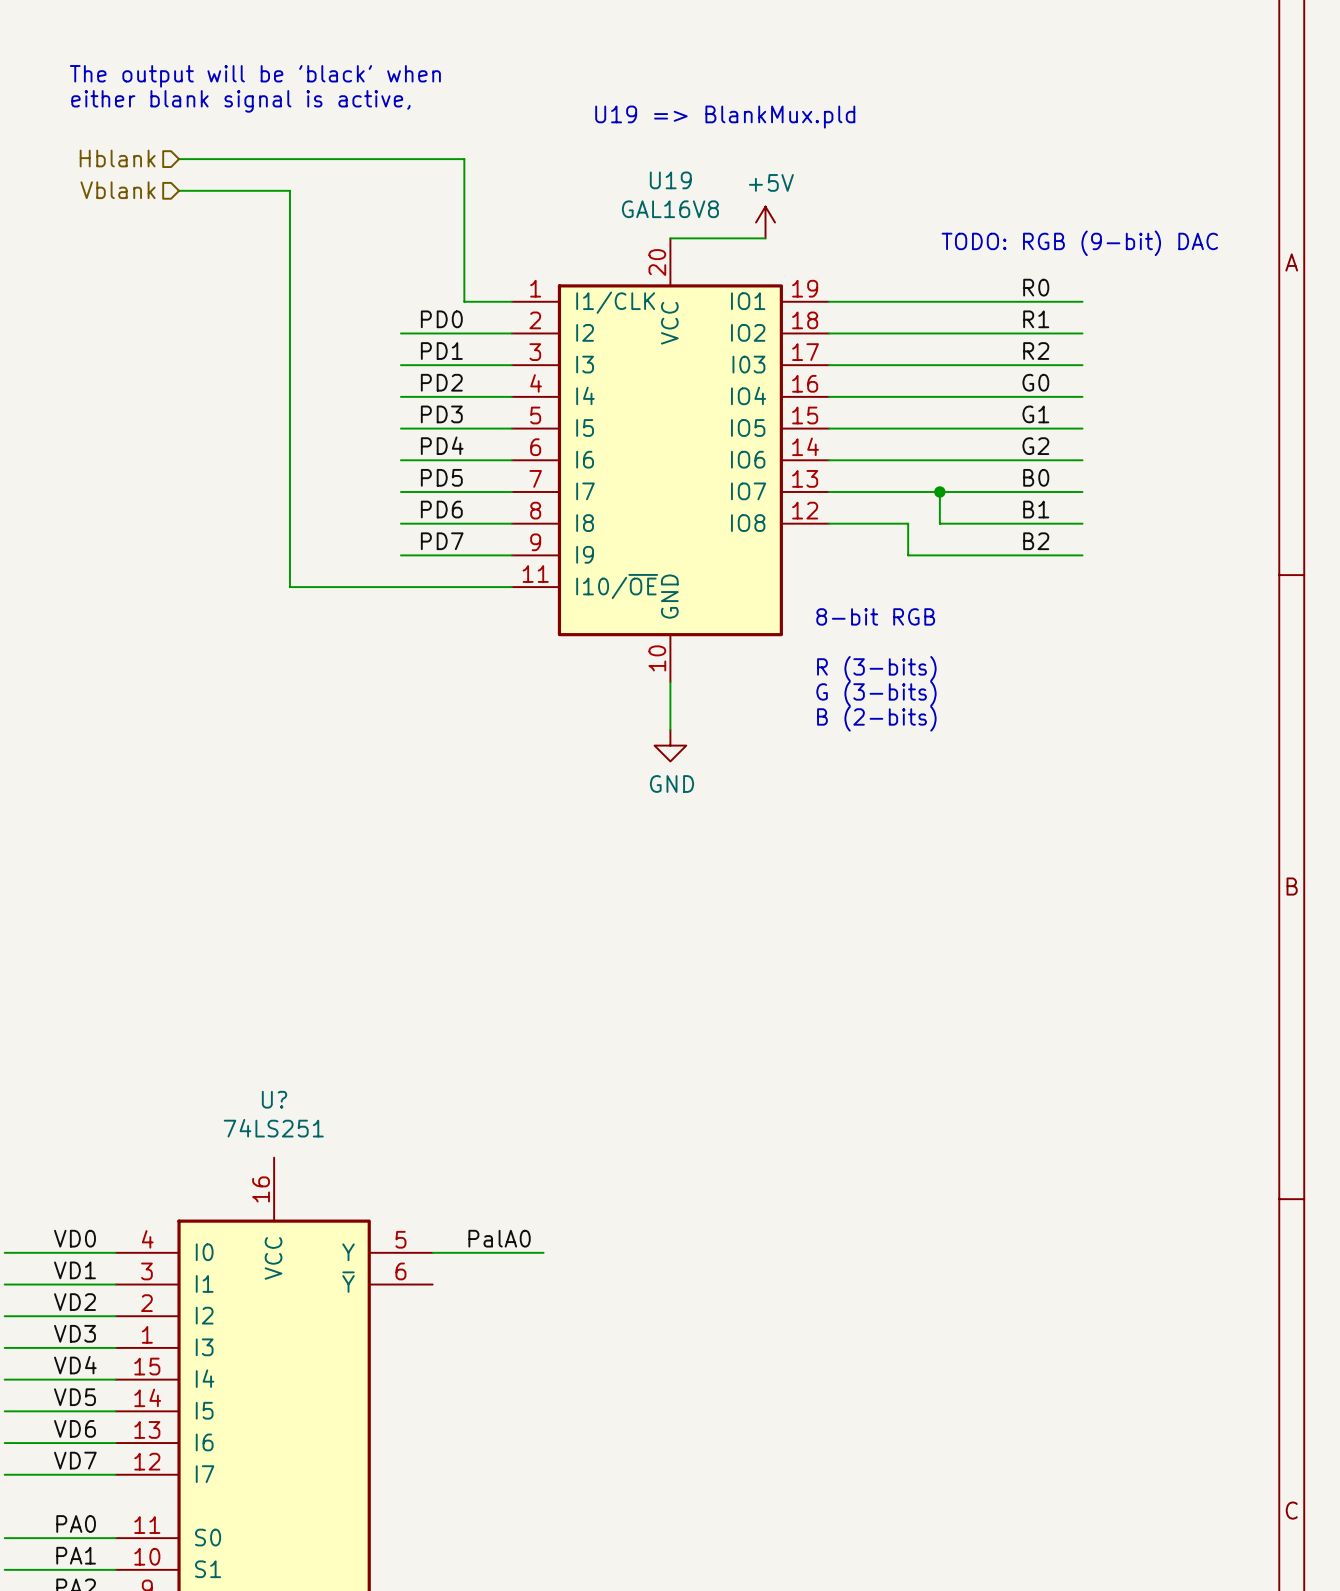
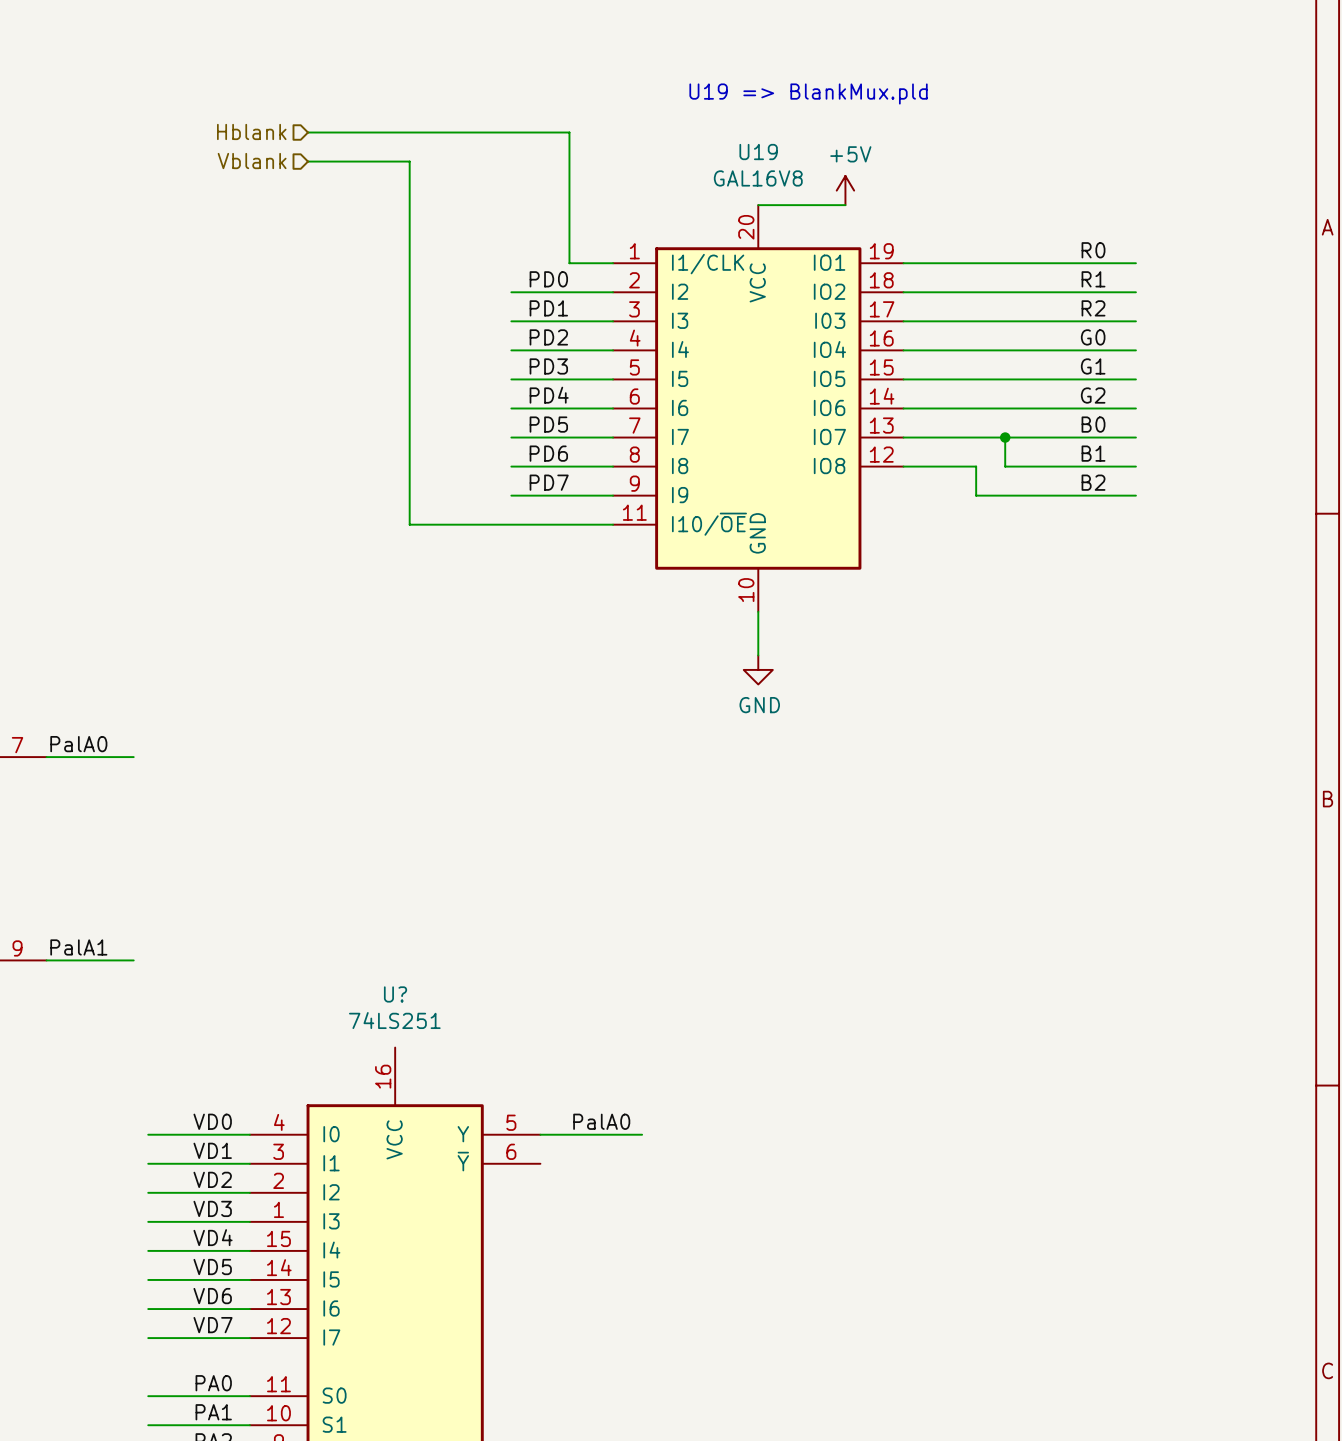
text: The output will be 'black' when (255, 76) -> none
text: either blank signal is active, (240, 101) -> none
text: TODO: RGB (9-bit) DAC (1079, 243) -> none
text: 8-bit RGB (875, 616) -> none
text: R (3-bits) (876, 668) -> none
text: G (3-bits) (876, 693) -> none
text: B (2-bits) (876, 718) -> none

